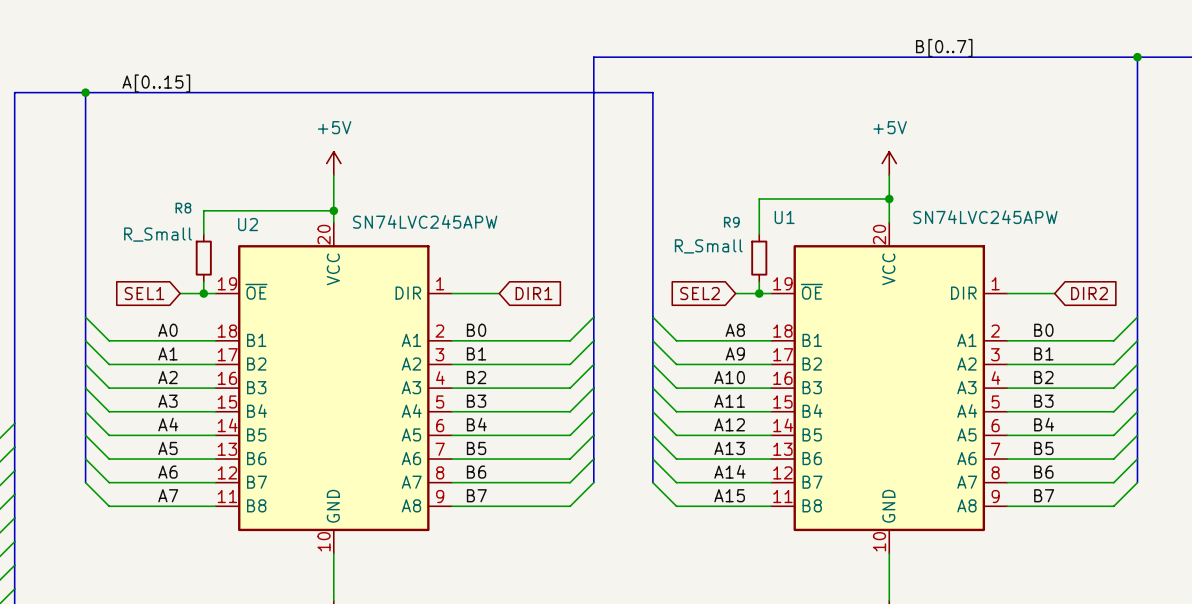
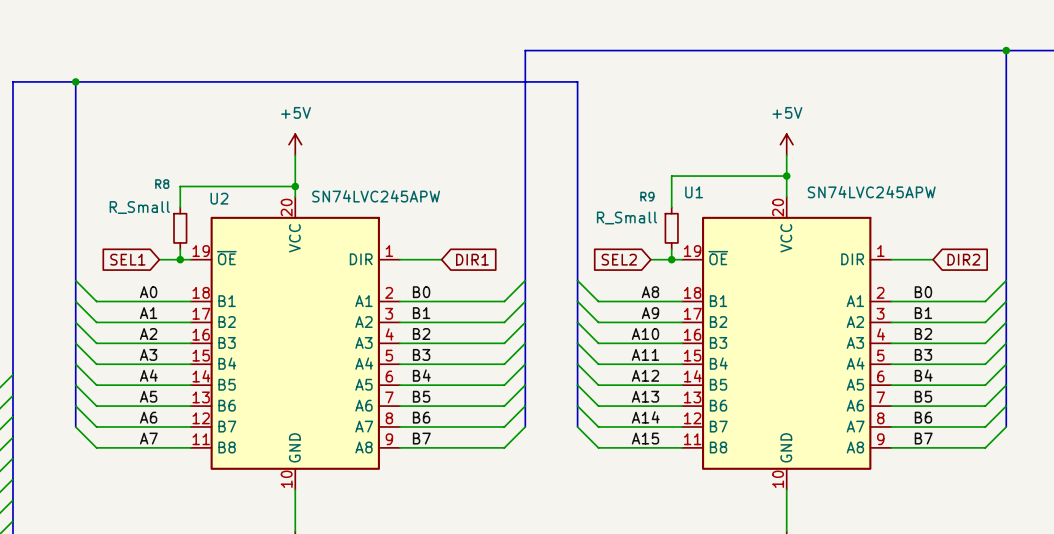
label: B[0..7] (944, 48) -> none
label: A[0..15] (156, 83) -> none

